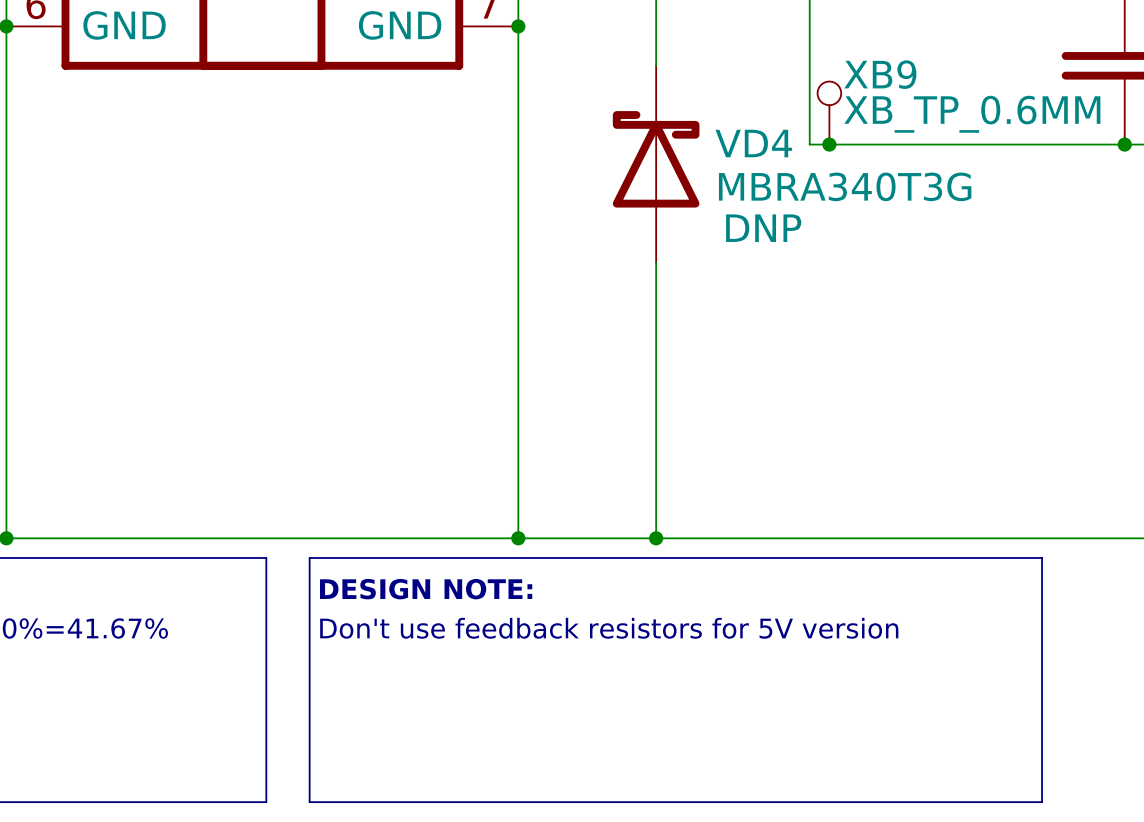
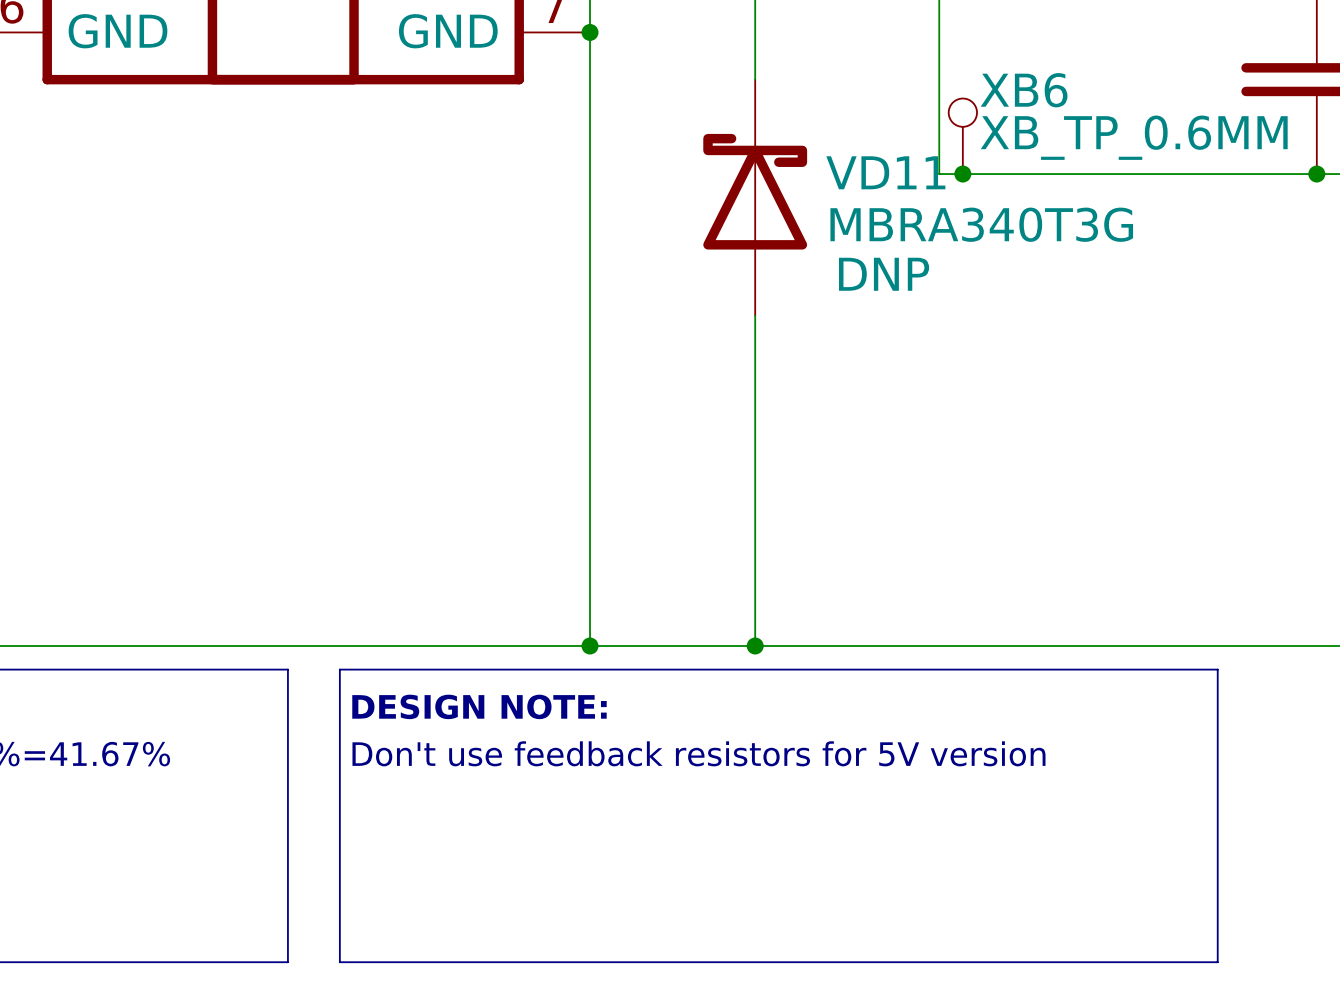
XB9 name: XB9 (880, 74) -> XB6 (1024, 90)
VD4 name: VD4 (753, 143) -> VD11 (885, 172)

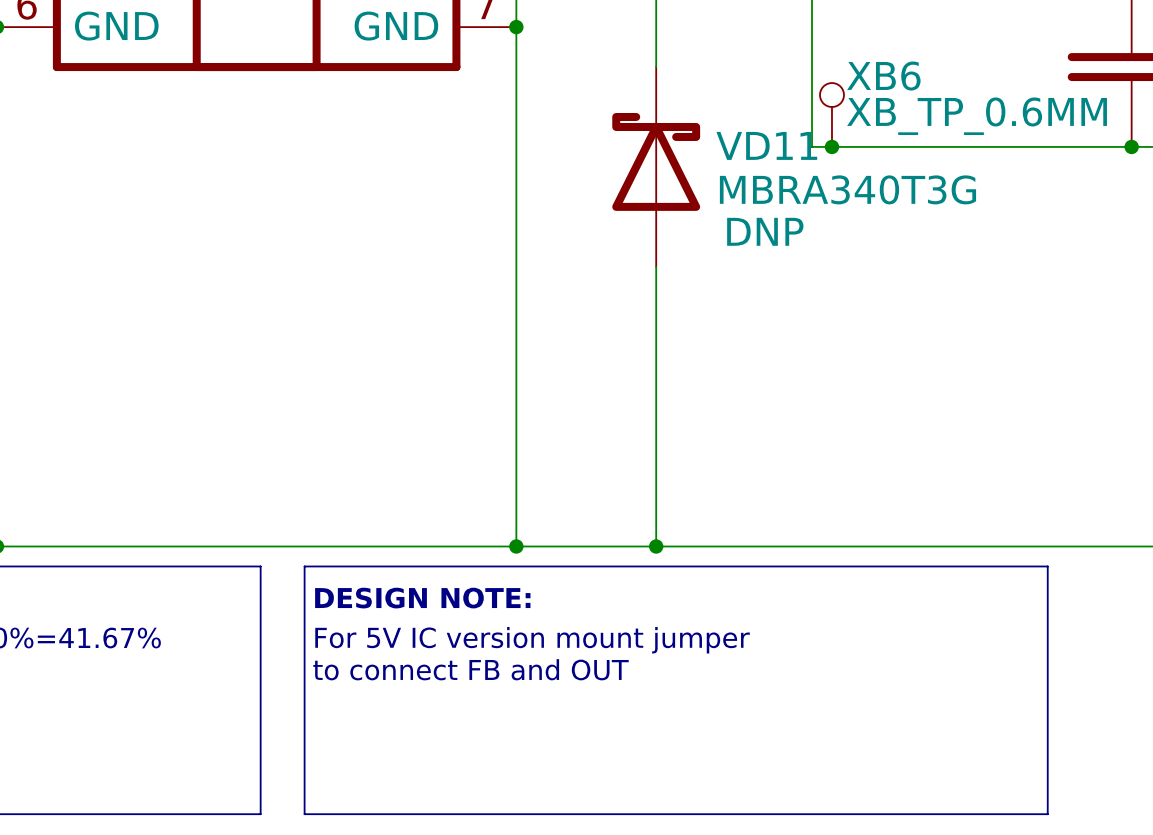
text: Don't use feedback resistors for 5V version (698, 753) -> For 5V IC version mount jumper (532, 640)
text: none -> to connect FB and OUT (471, 669)

